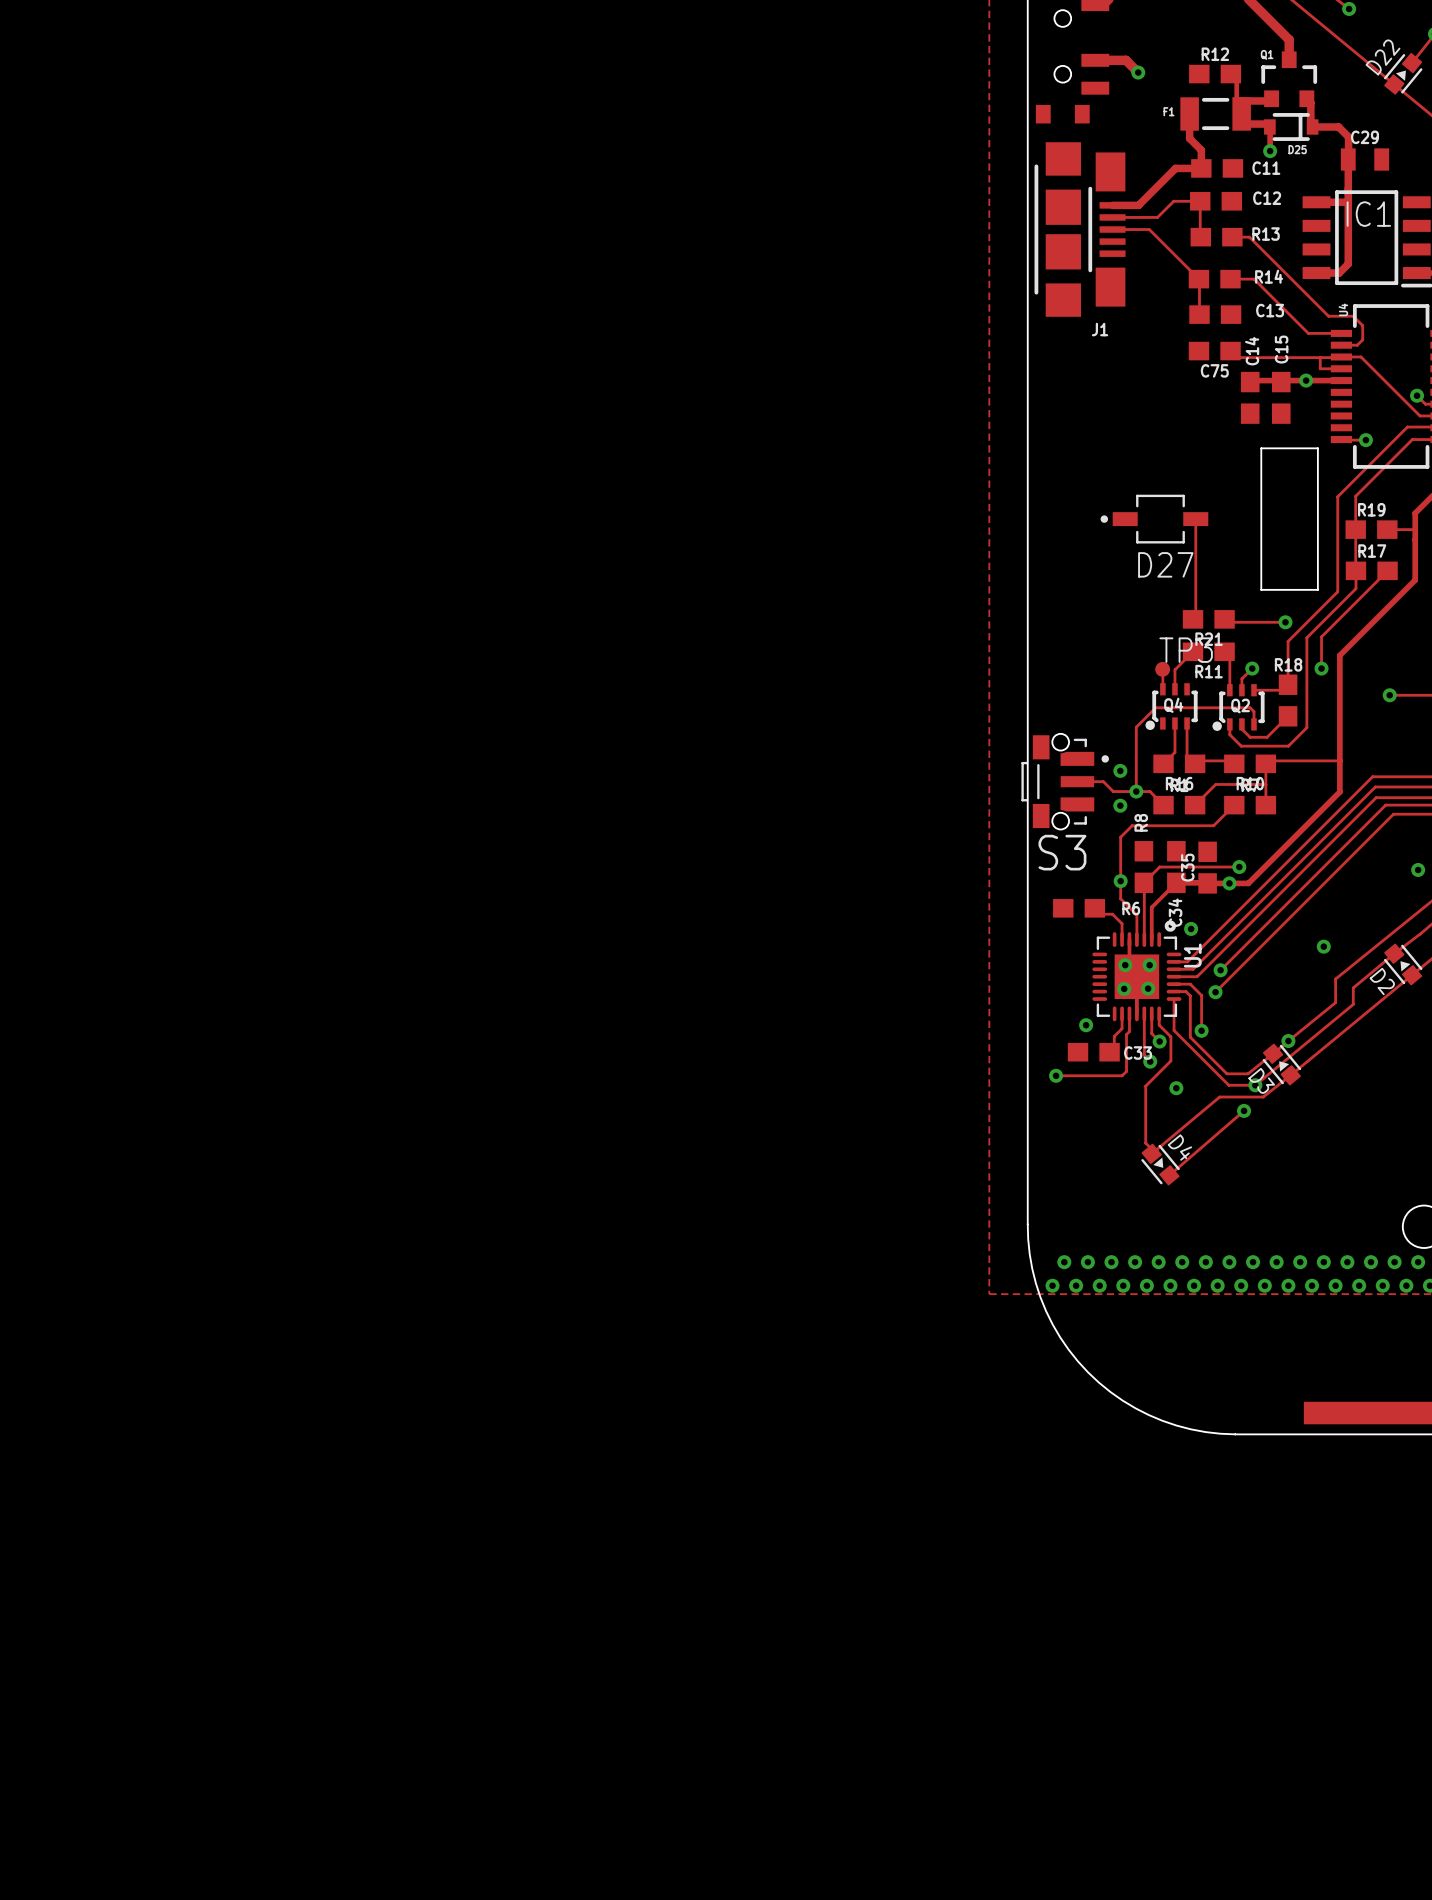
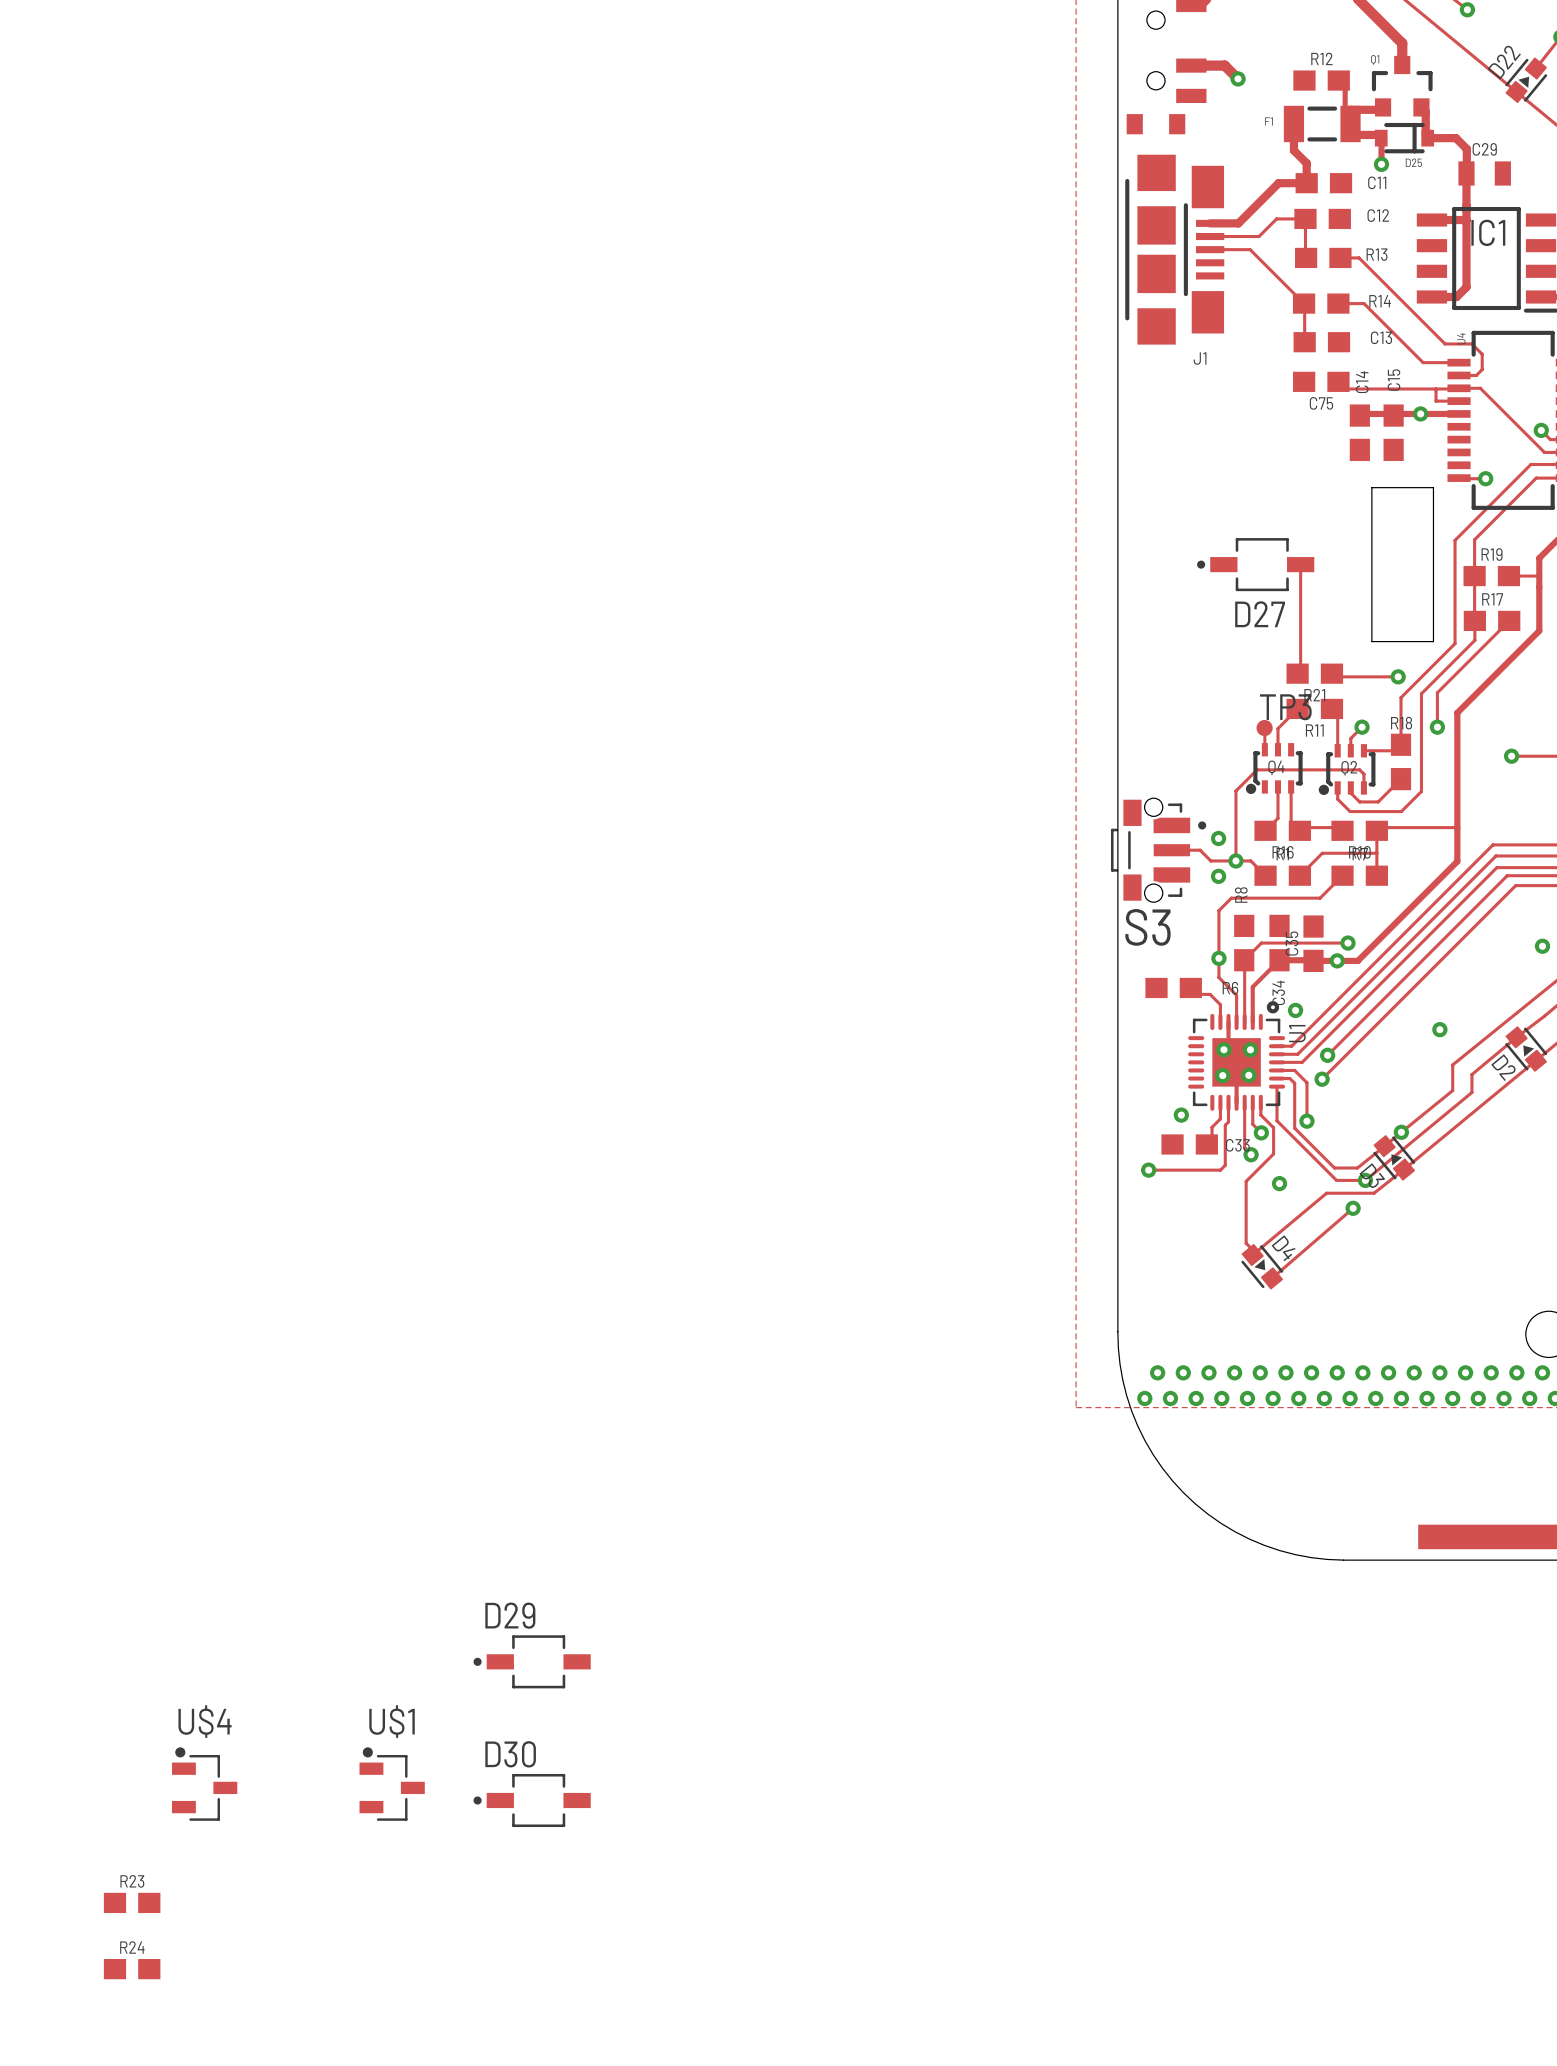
D29: none -> (532, 1661)
U$4: none -> (204, 1784)
U$1: none -> (392, 1784)
D30: none -> (532, 1800)
R23: none -> (132, 1902)
R24: none -> (132, 1969)

